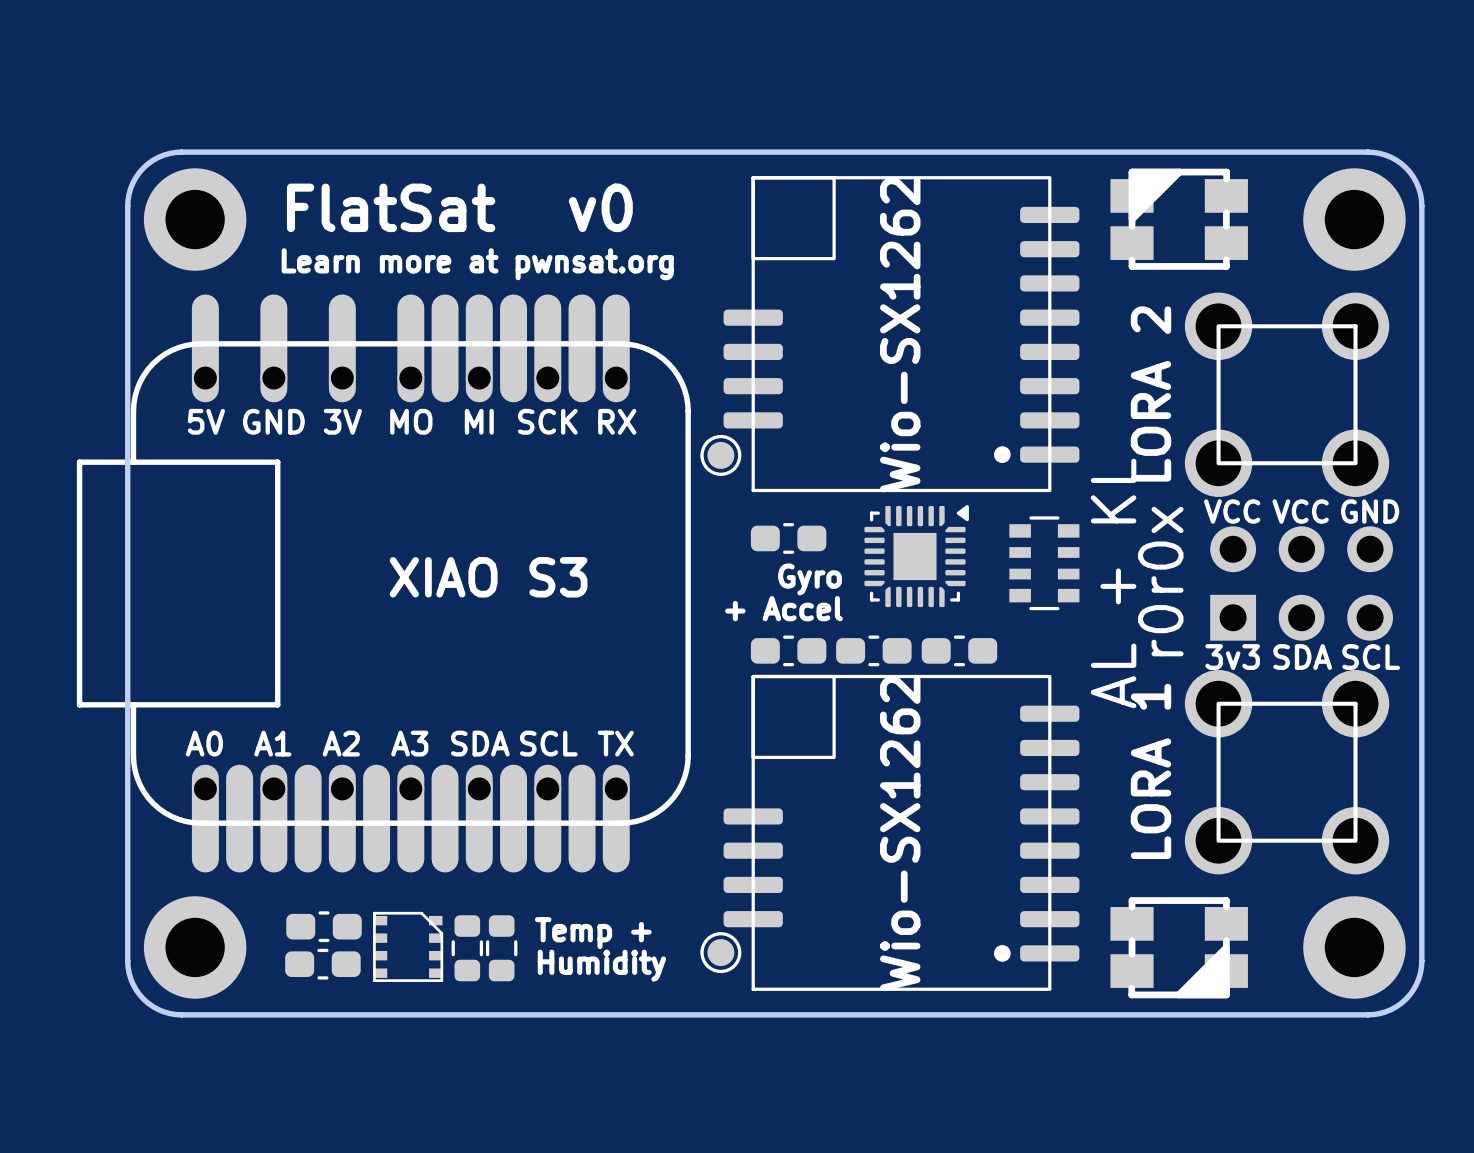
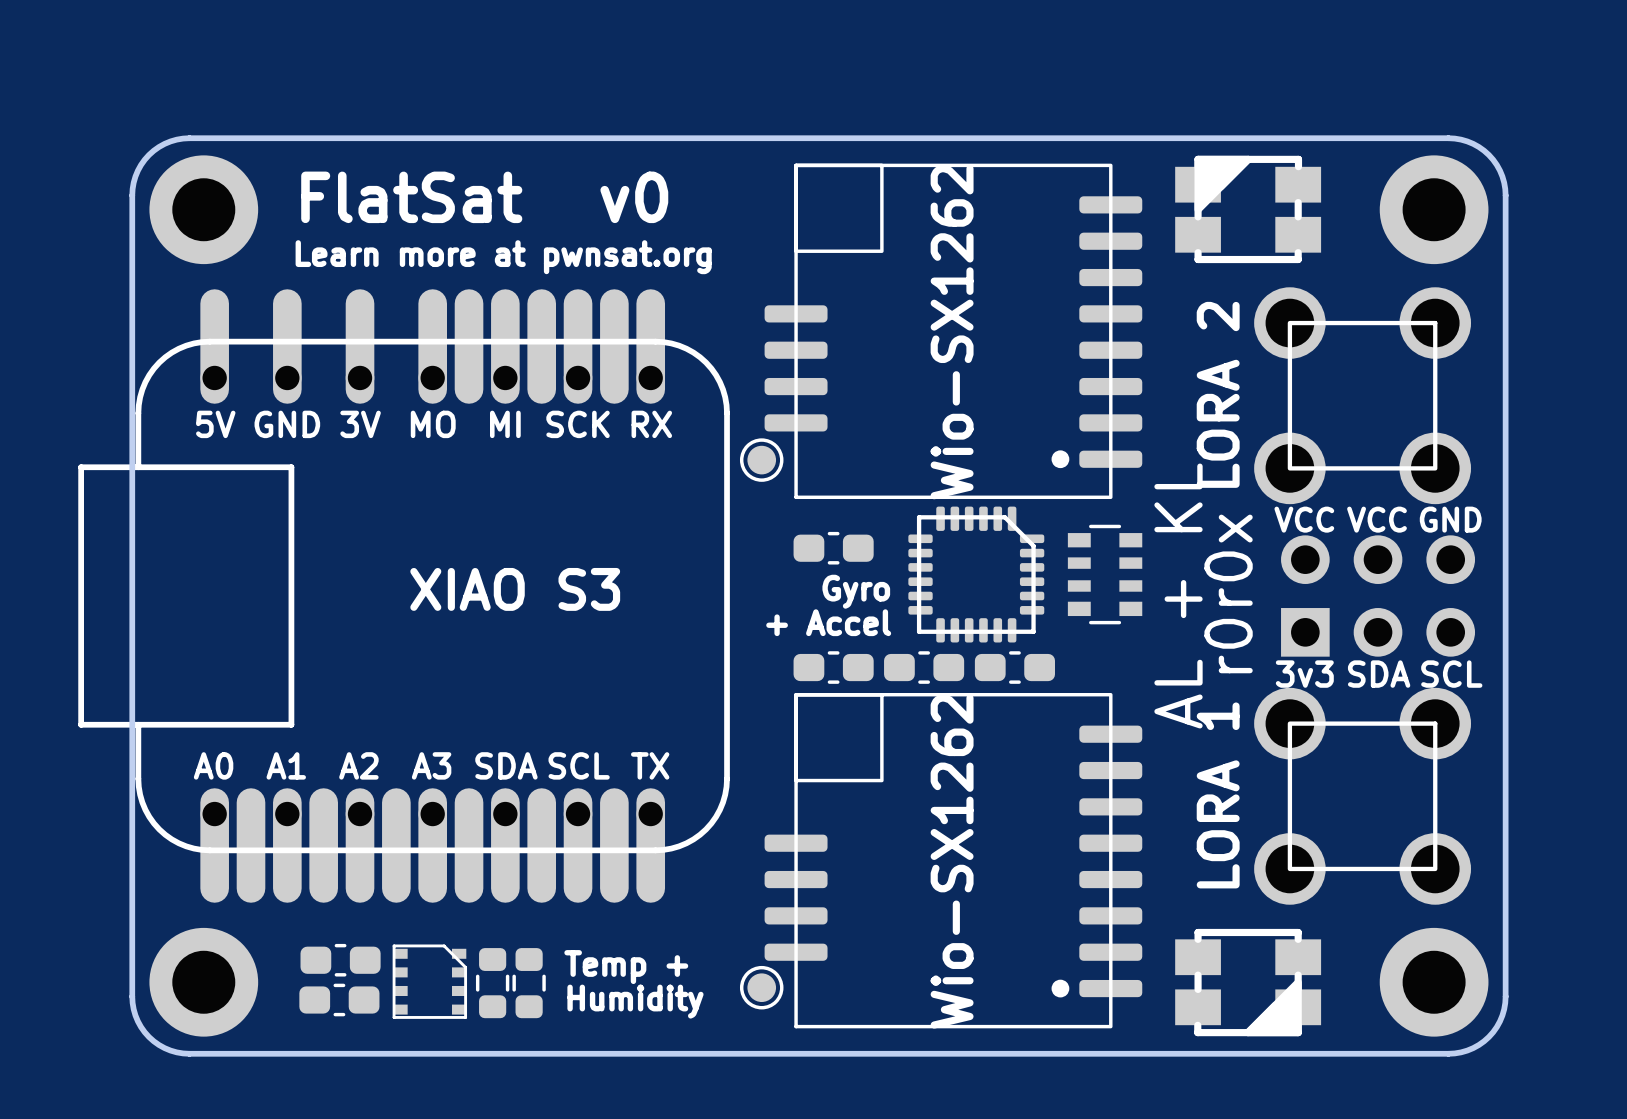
part footprint: [864, 505, 969, 608] -> [908, 506, 1045, 643]

